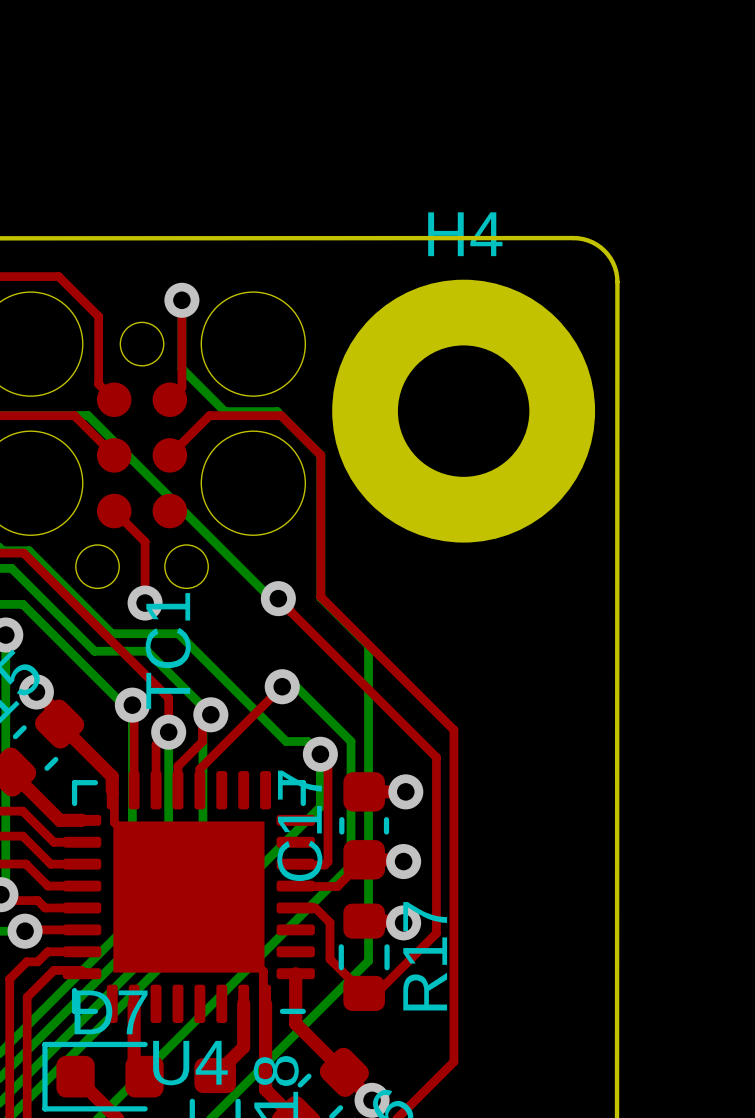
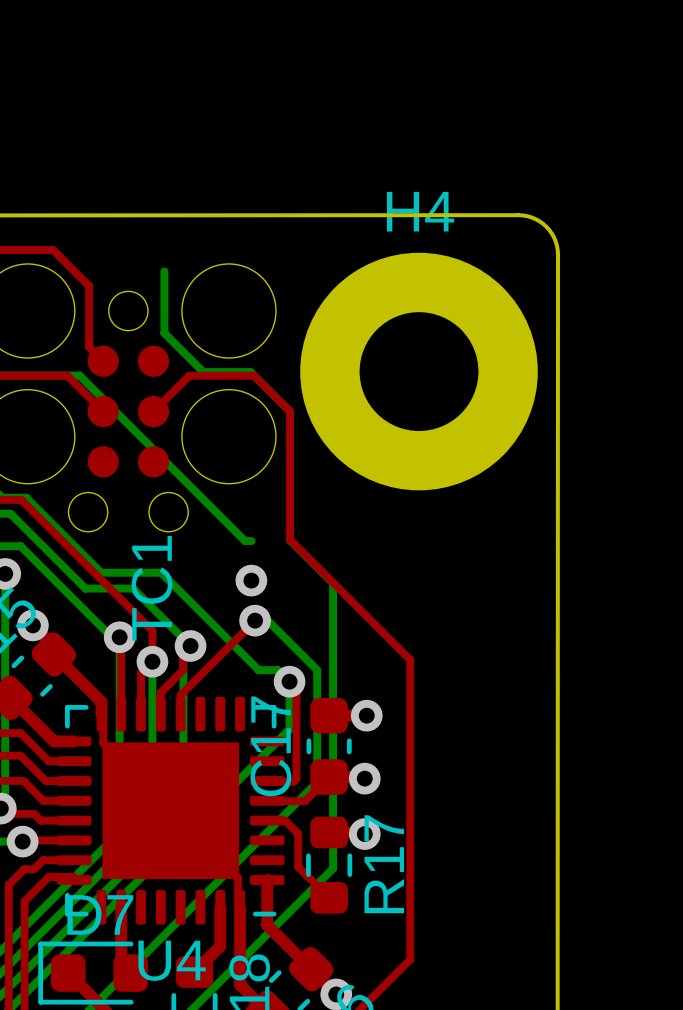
top track: (181, 300) (181, 387) (169, 399) -> none
via: (181, 300) -> none
top track: (114, 511) (145, 541) (145, 603) -> none
via position: (278, 598) -> (251, 580)
via: (145, 603) -> none
top track: (290, 611) (436, 757) (436, 933) (376, 993) (364, 993) -> none

